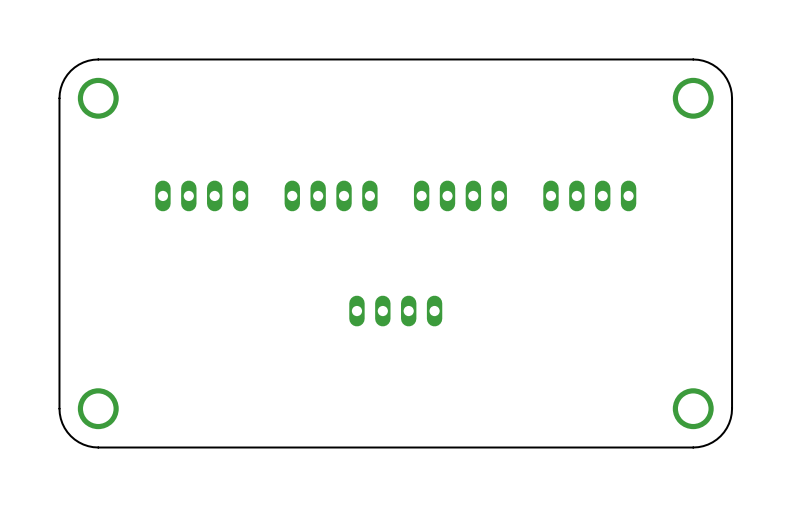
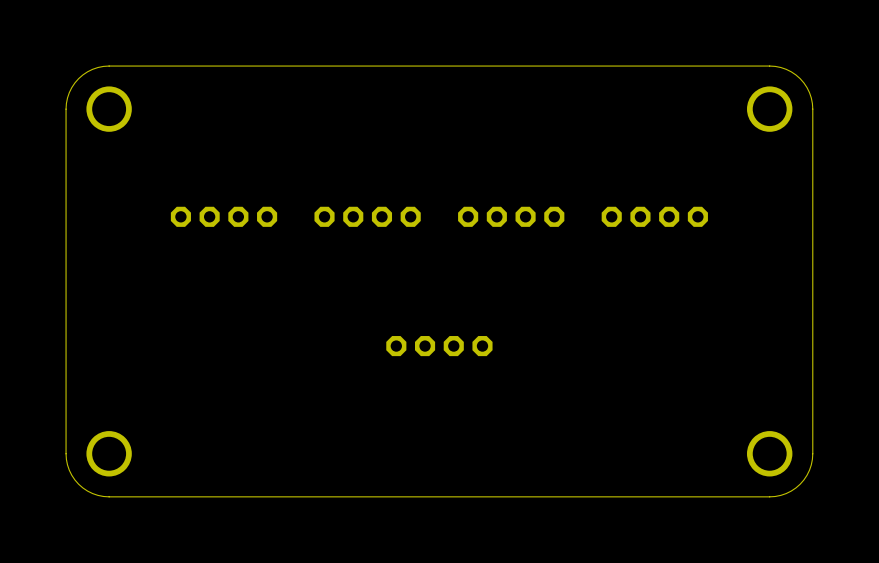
part footprint: [155, 180, 249, 212] -> [170, 206, 278, 227]
part footprint: [284, 180, 378, 212] -> [314, 206, 421, 227]
part footprint: [413, 180, 507, 212] -> [458, 206, 565, 227]
part footprint: [543, 180, 637, 212] -> [601, 206, 708, 227]
part footprint: [349, 295, 443, 327] -> [386, 336, 493, 357]

